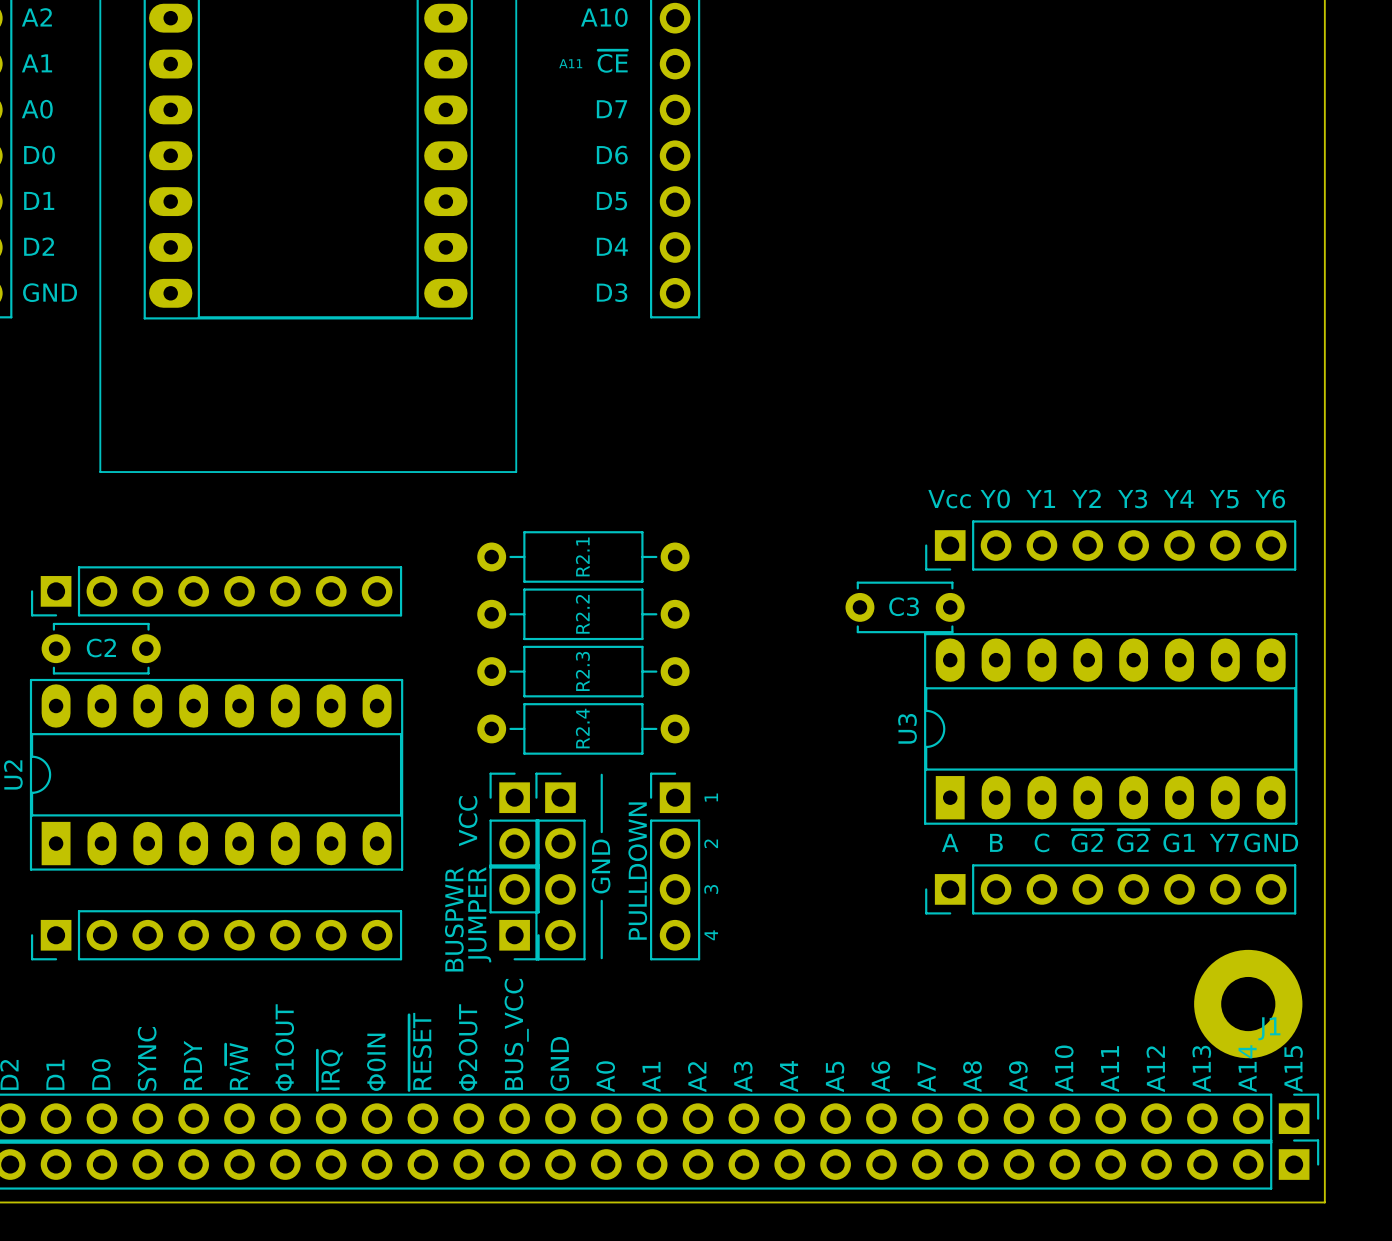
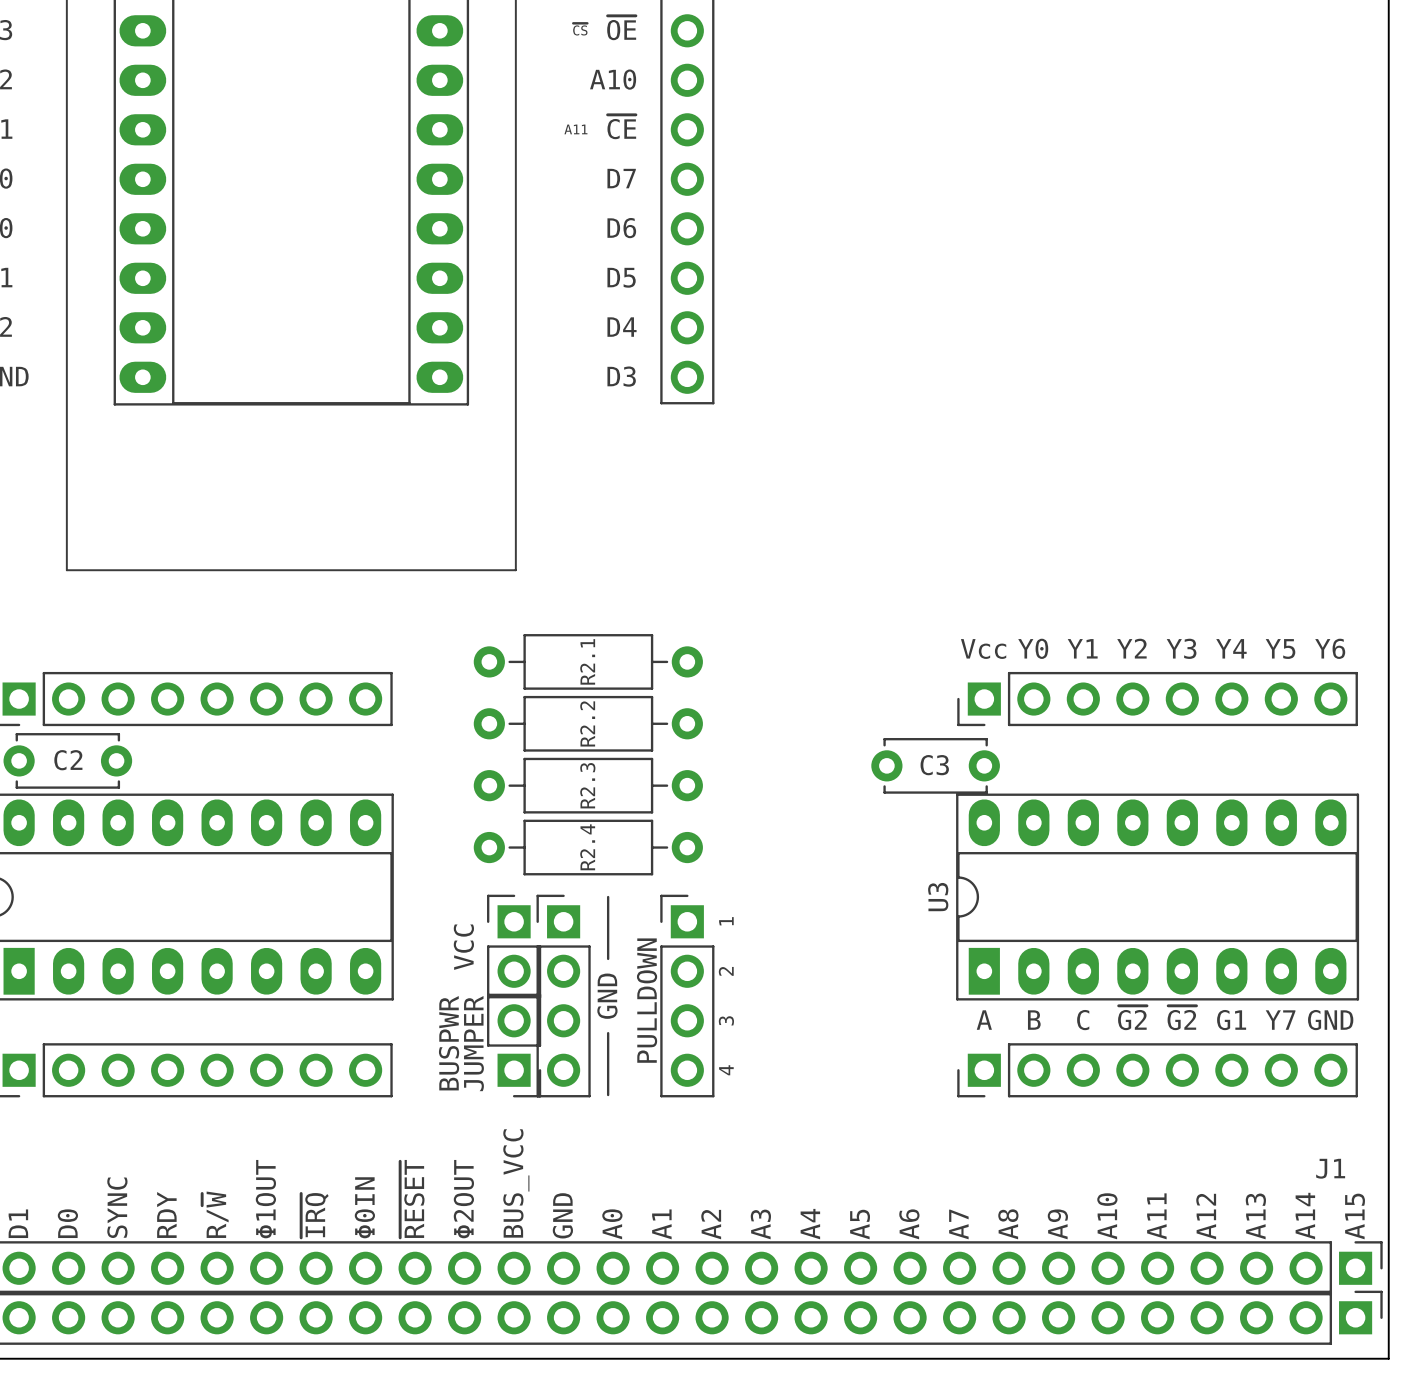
part position: (1110, 545) -> (1157, 699)
C3 position: (905, 607) -> (935, 765)
U3 position: (1110, 728) -> (1157, 897)
part position: (1110, 889) -> (1157, 1070)
part: (1248, 1004) -> none

